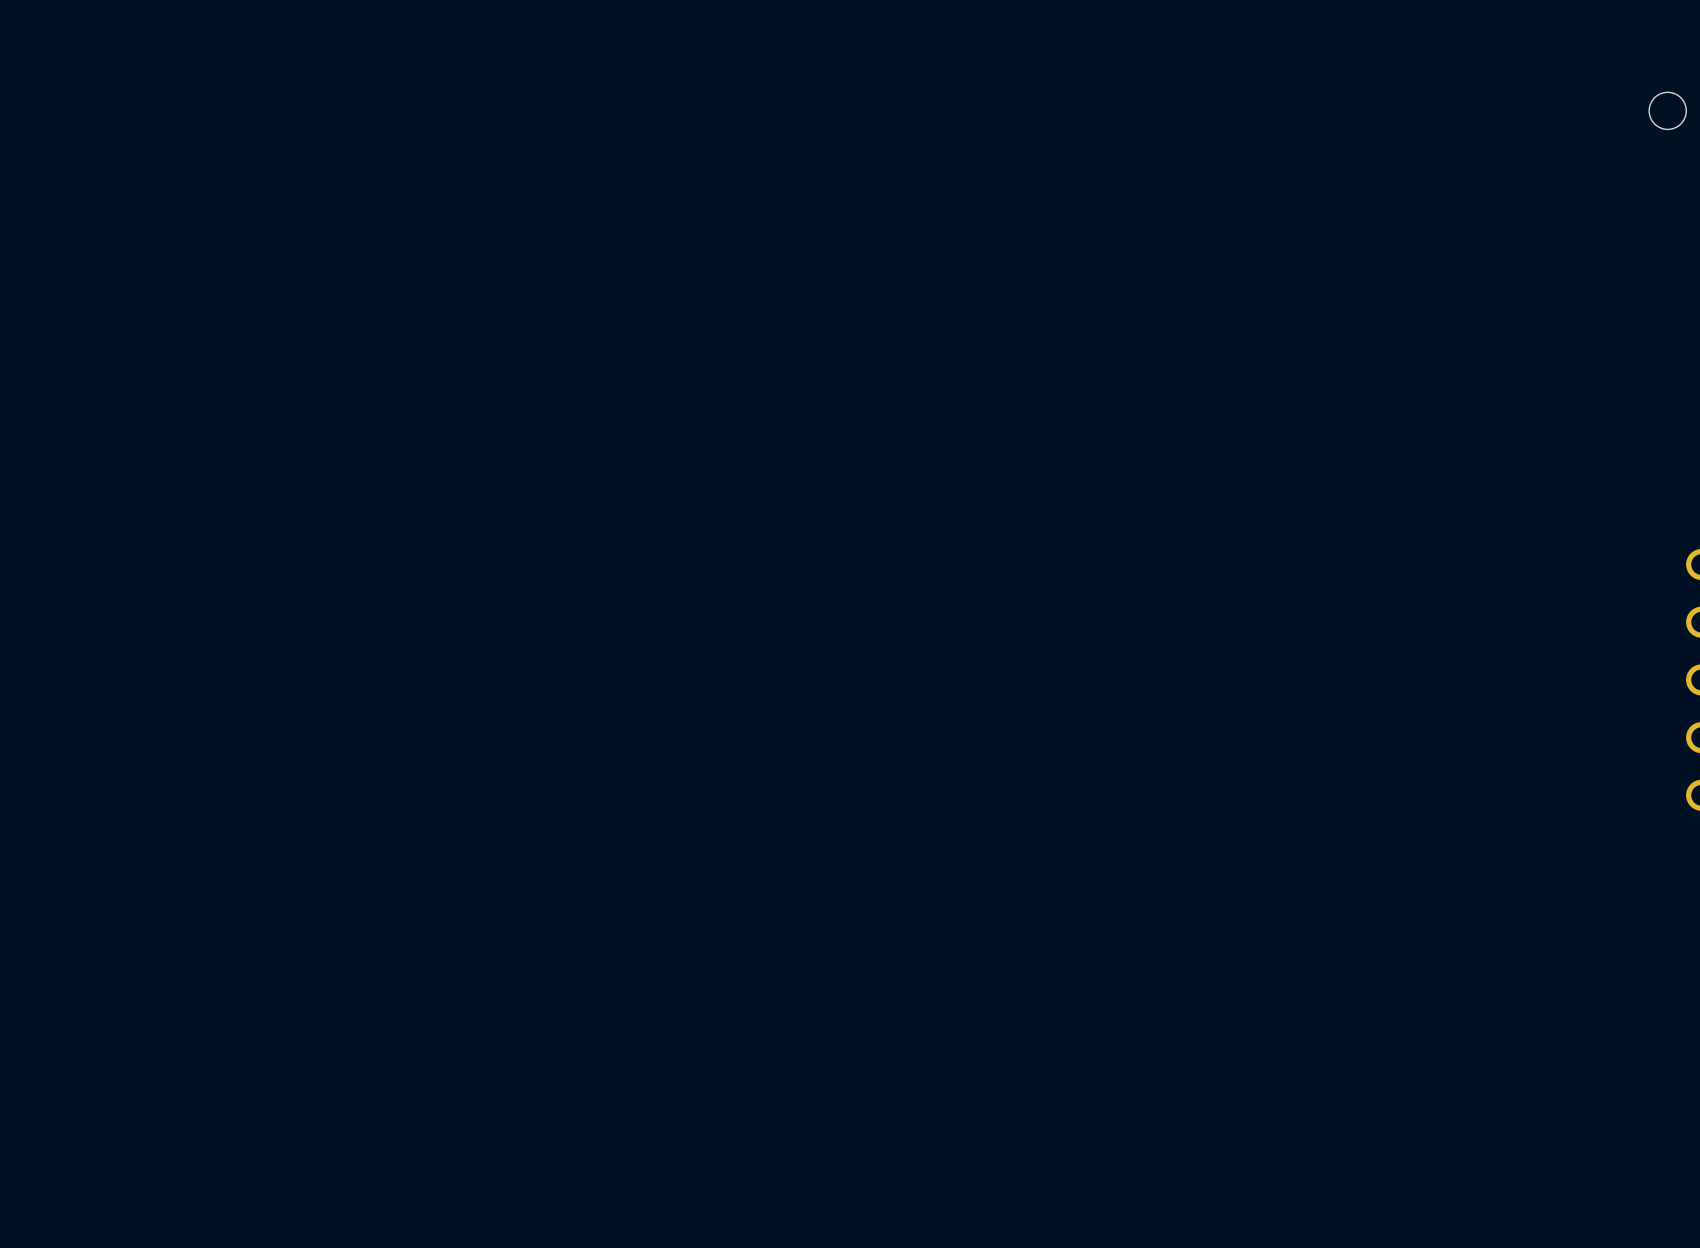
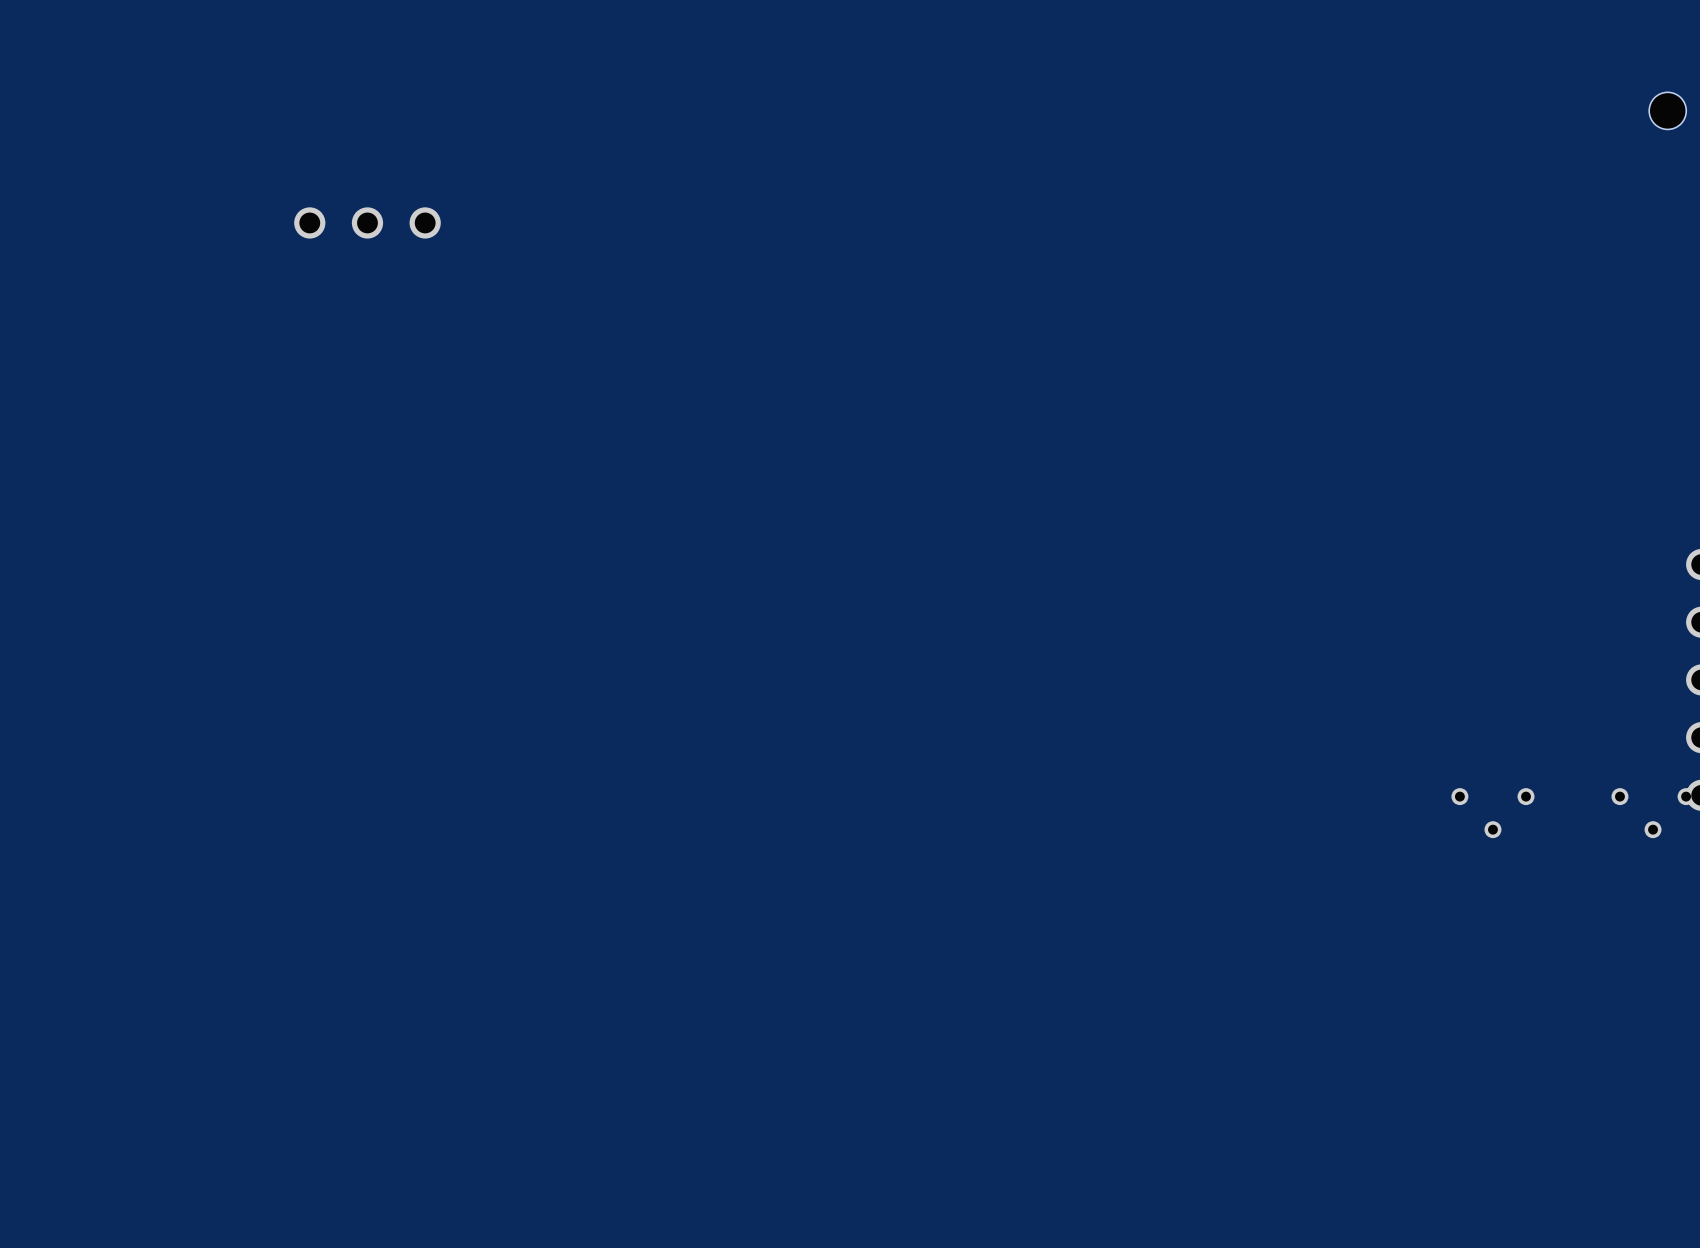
part: none -> (309, 222)
part: none -> (367, 222)
part: none -> (425, 222)
part: none -> (1492, 813)
part: none -> (1653, 813)

